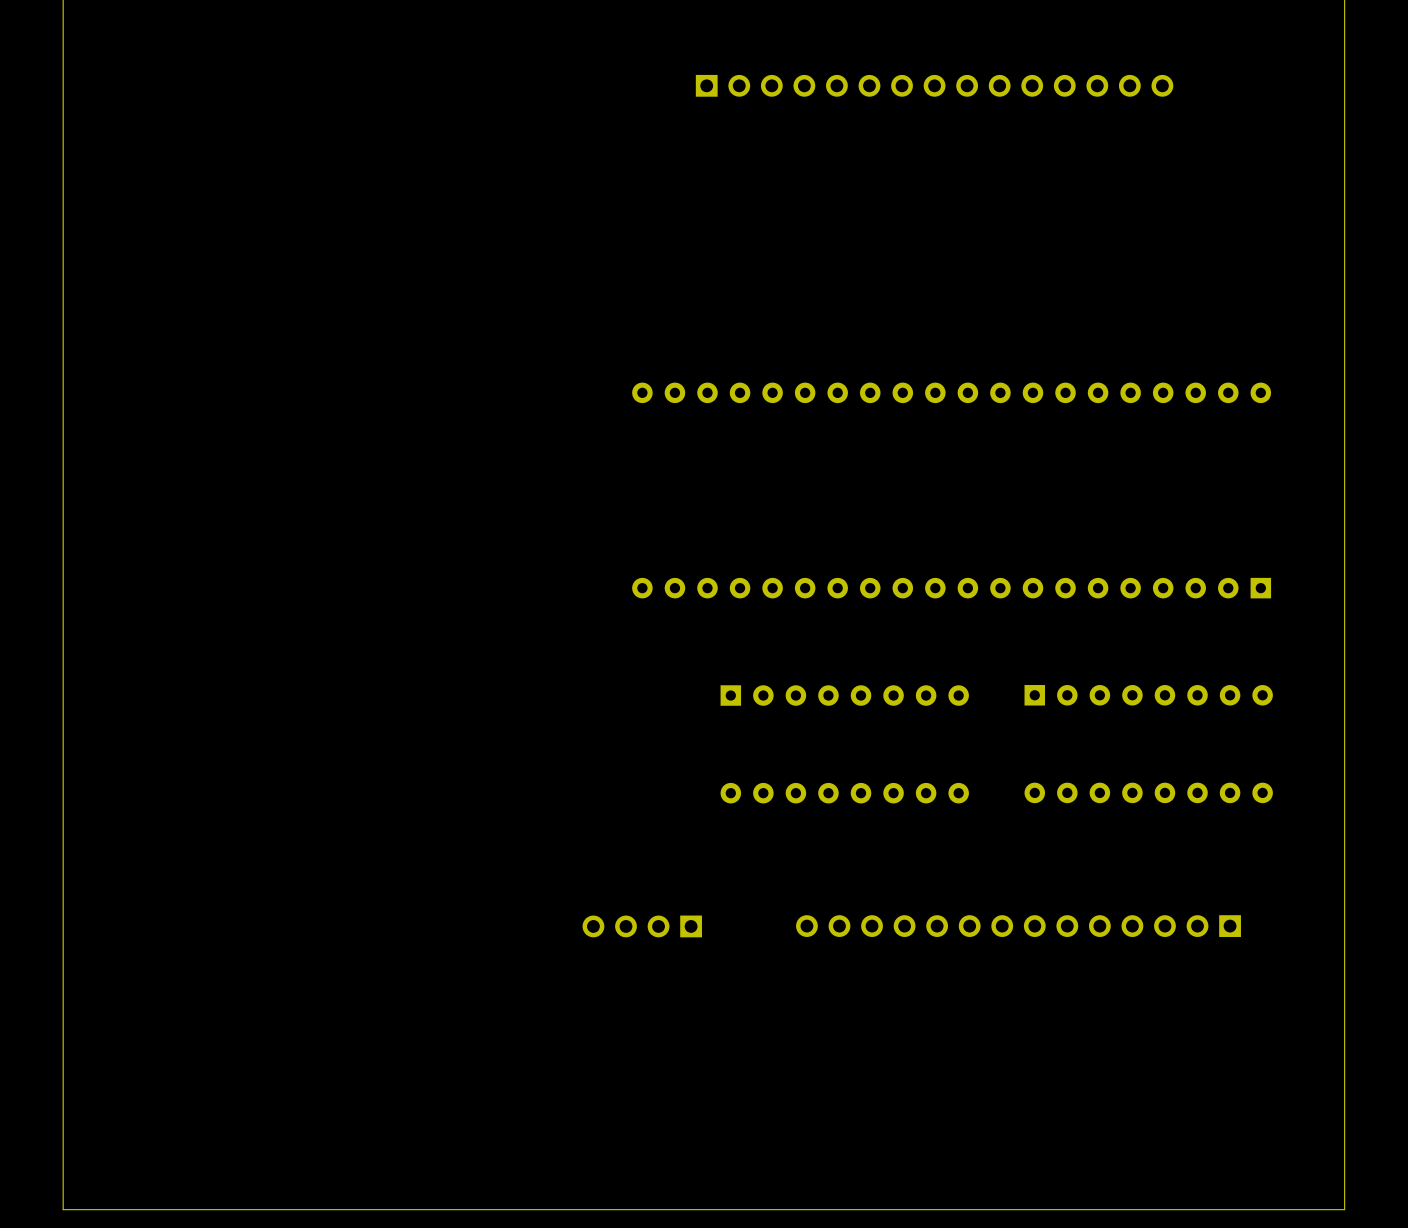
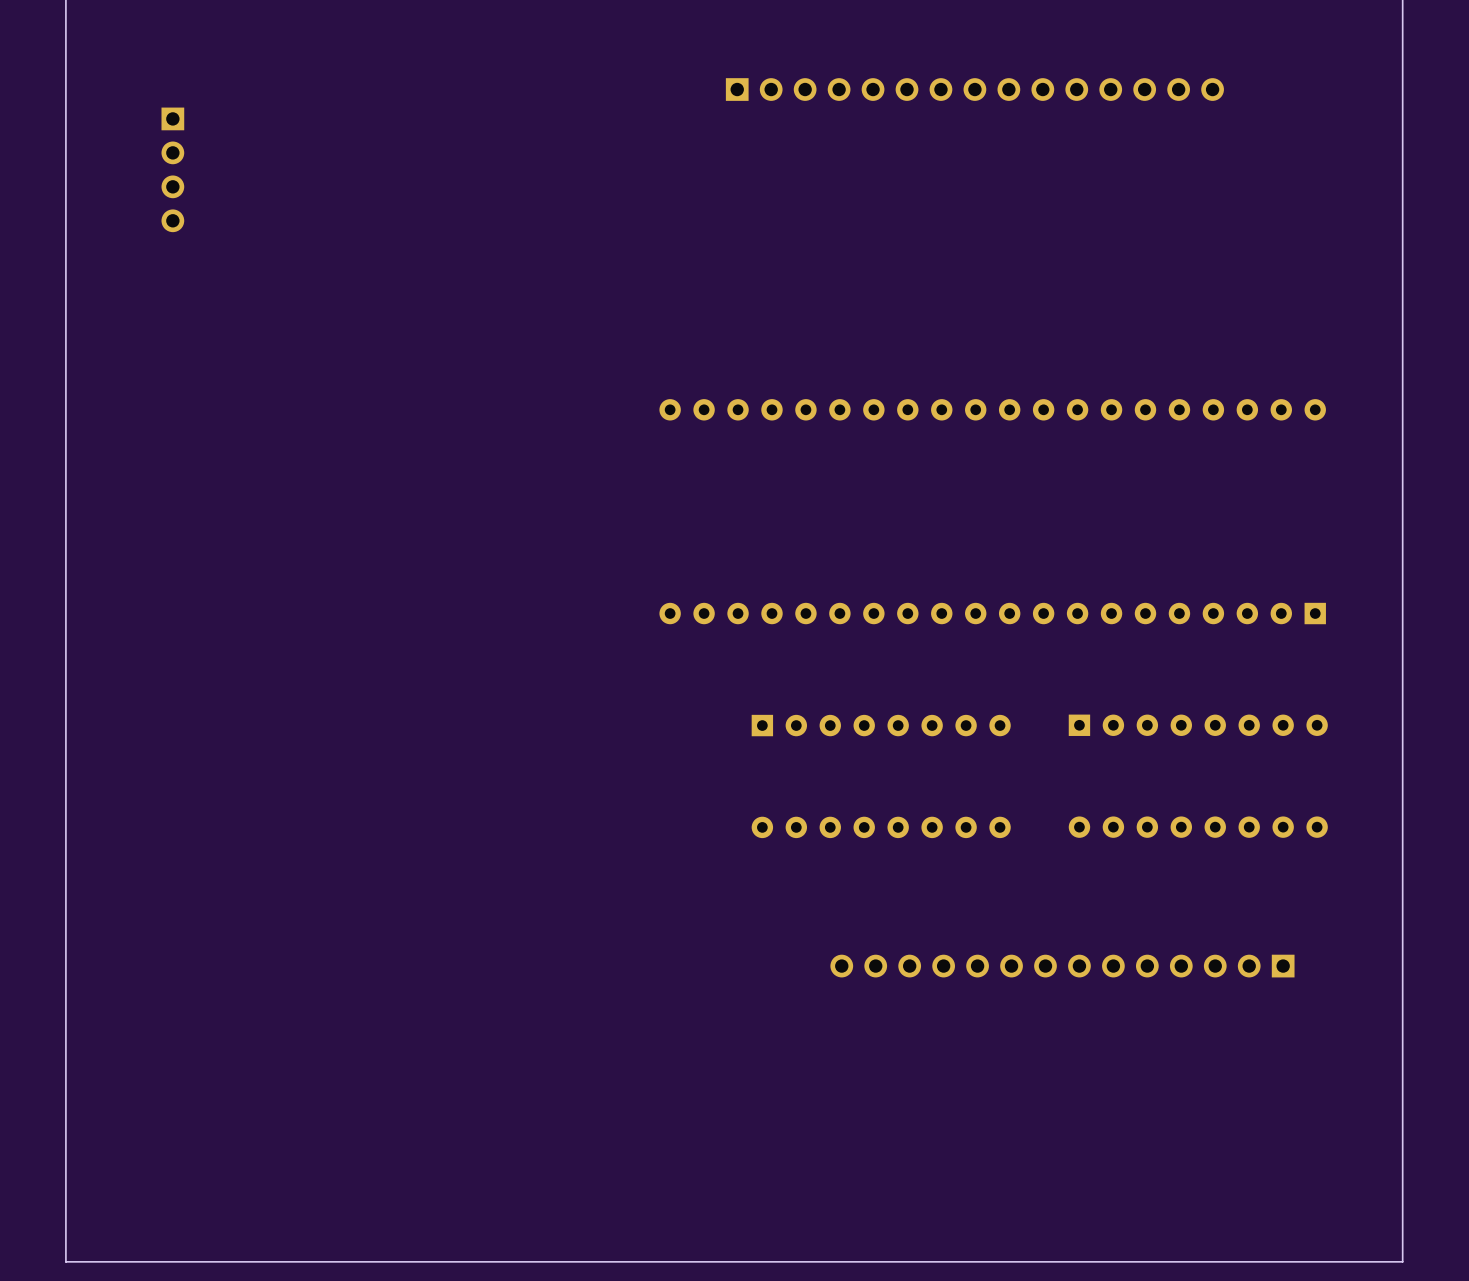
part: none -> (172, 169)
part: (642, 926) -> none

